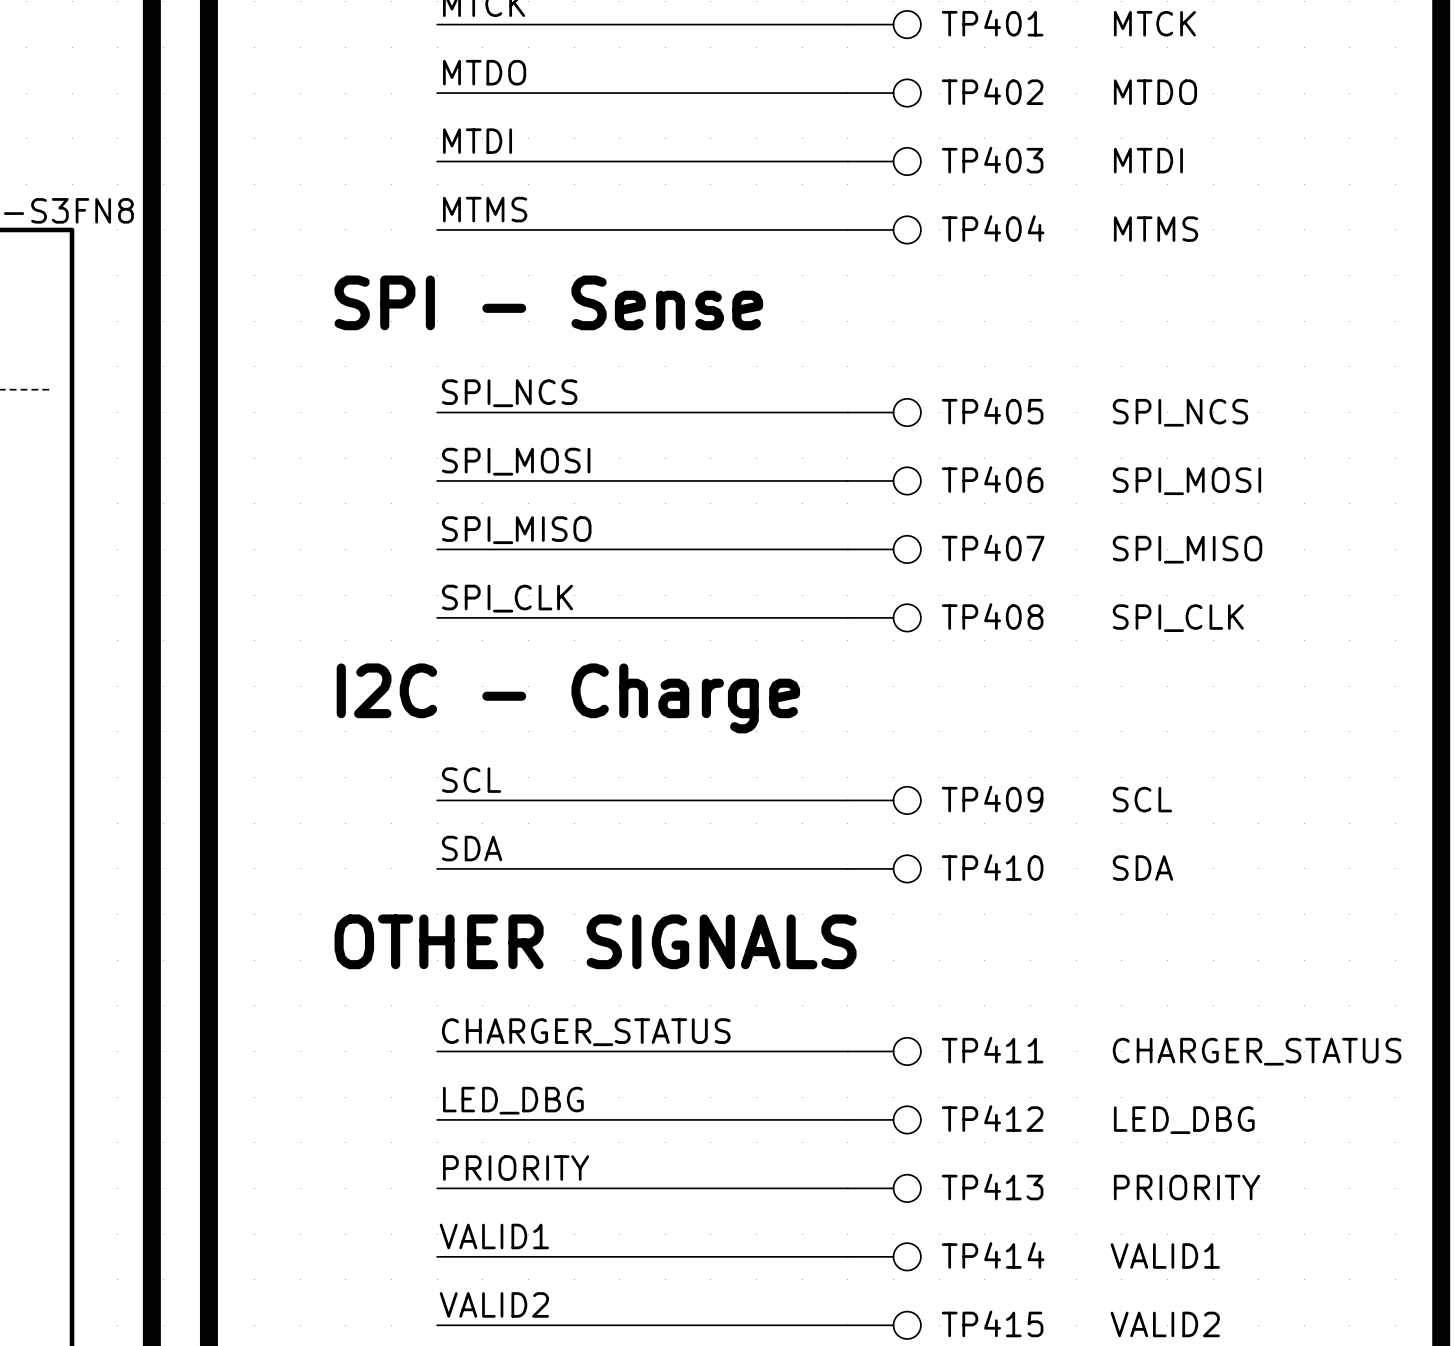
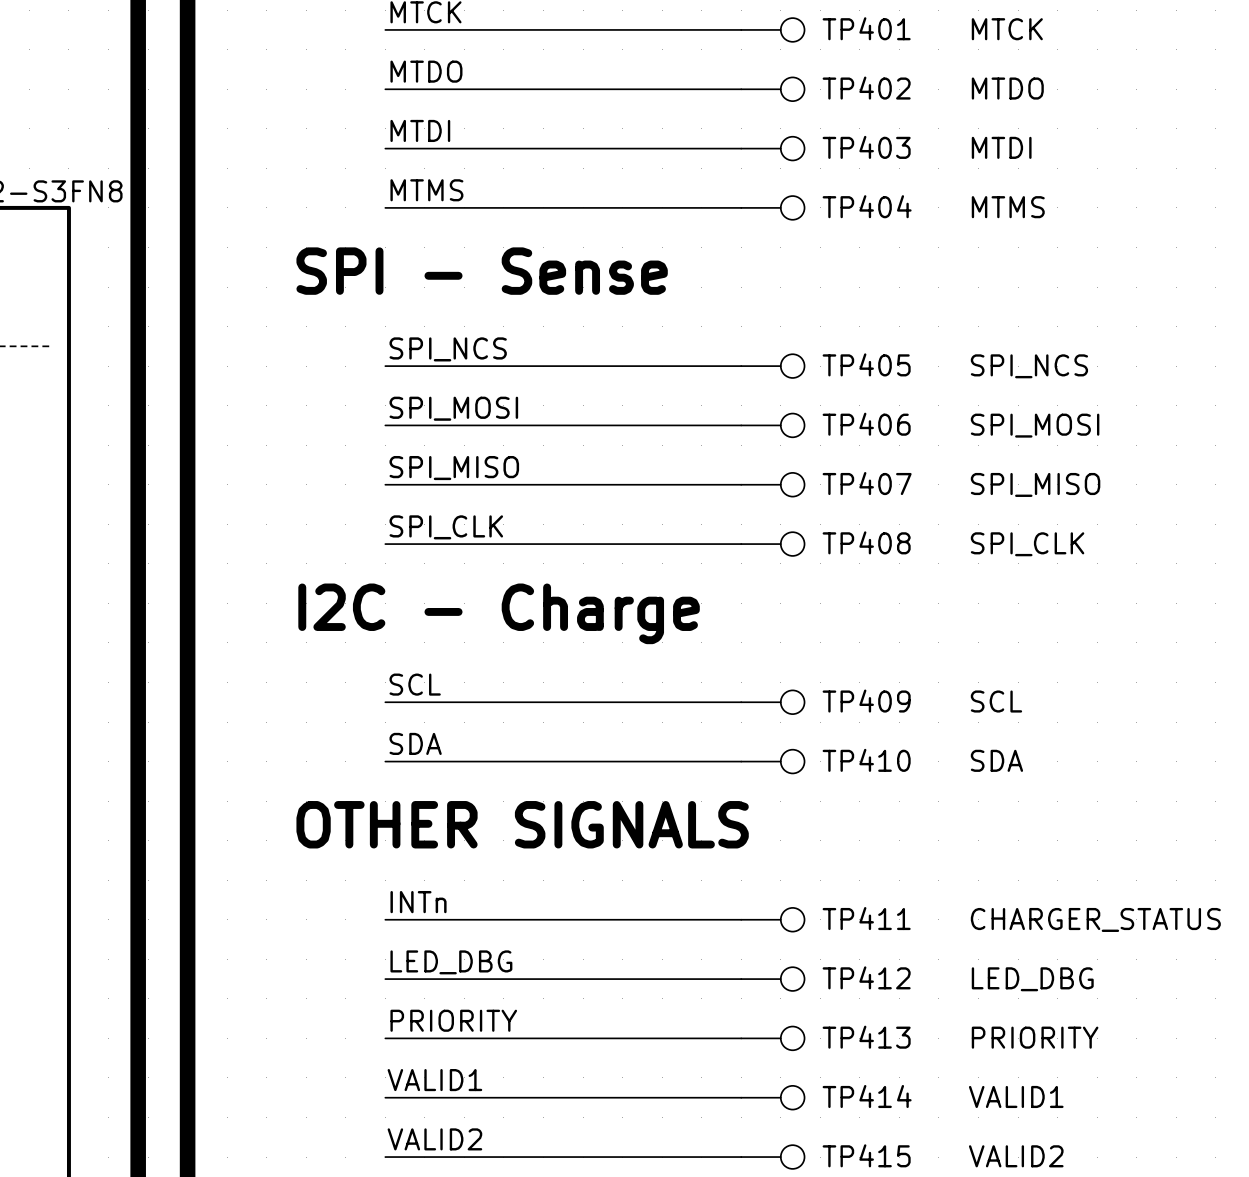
label: CHARGER_STATUS (586, 1032) -> INTn (418, 902)

